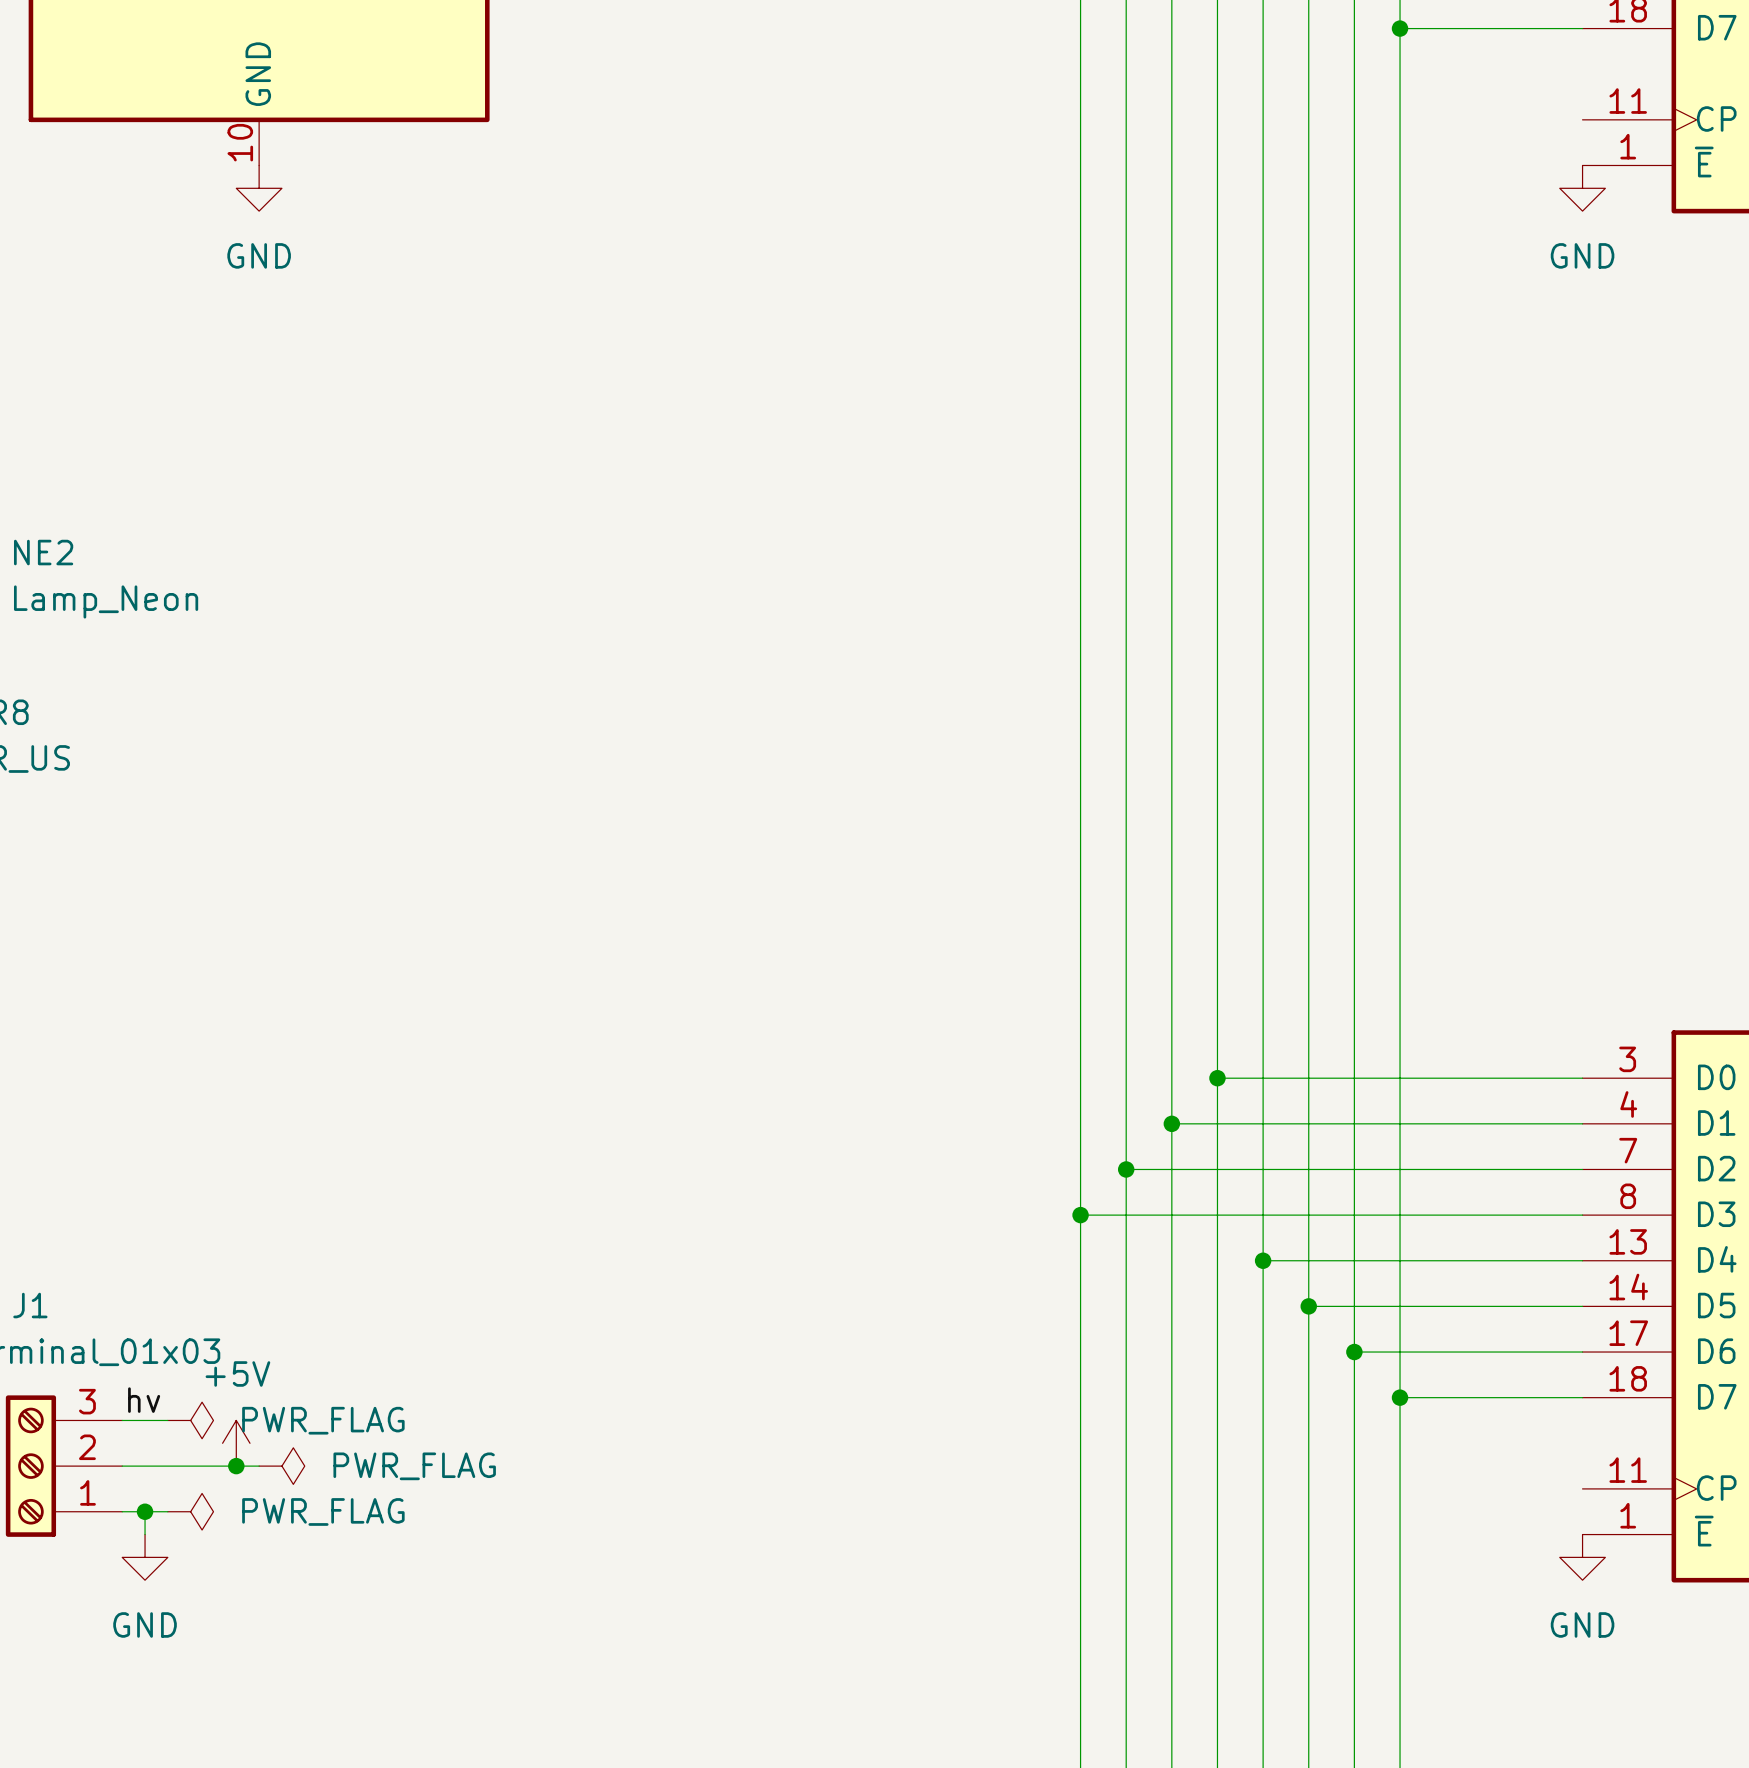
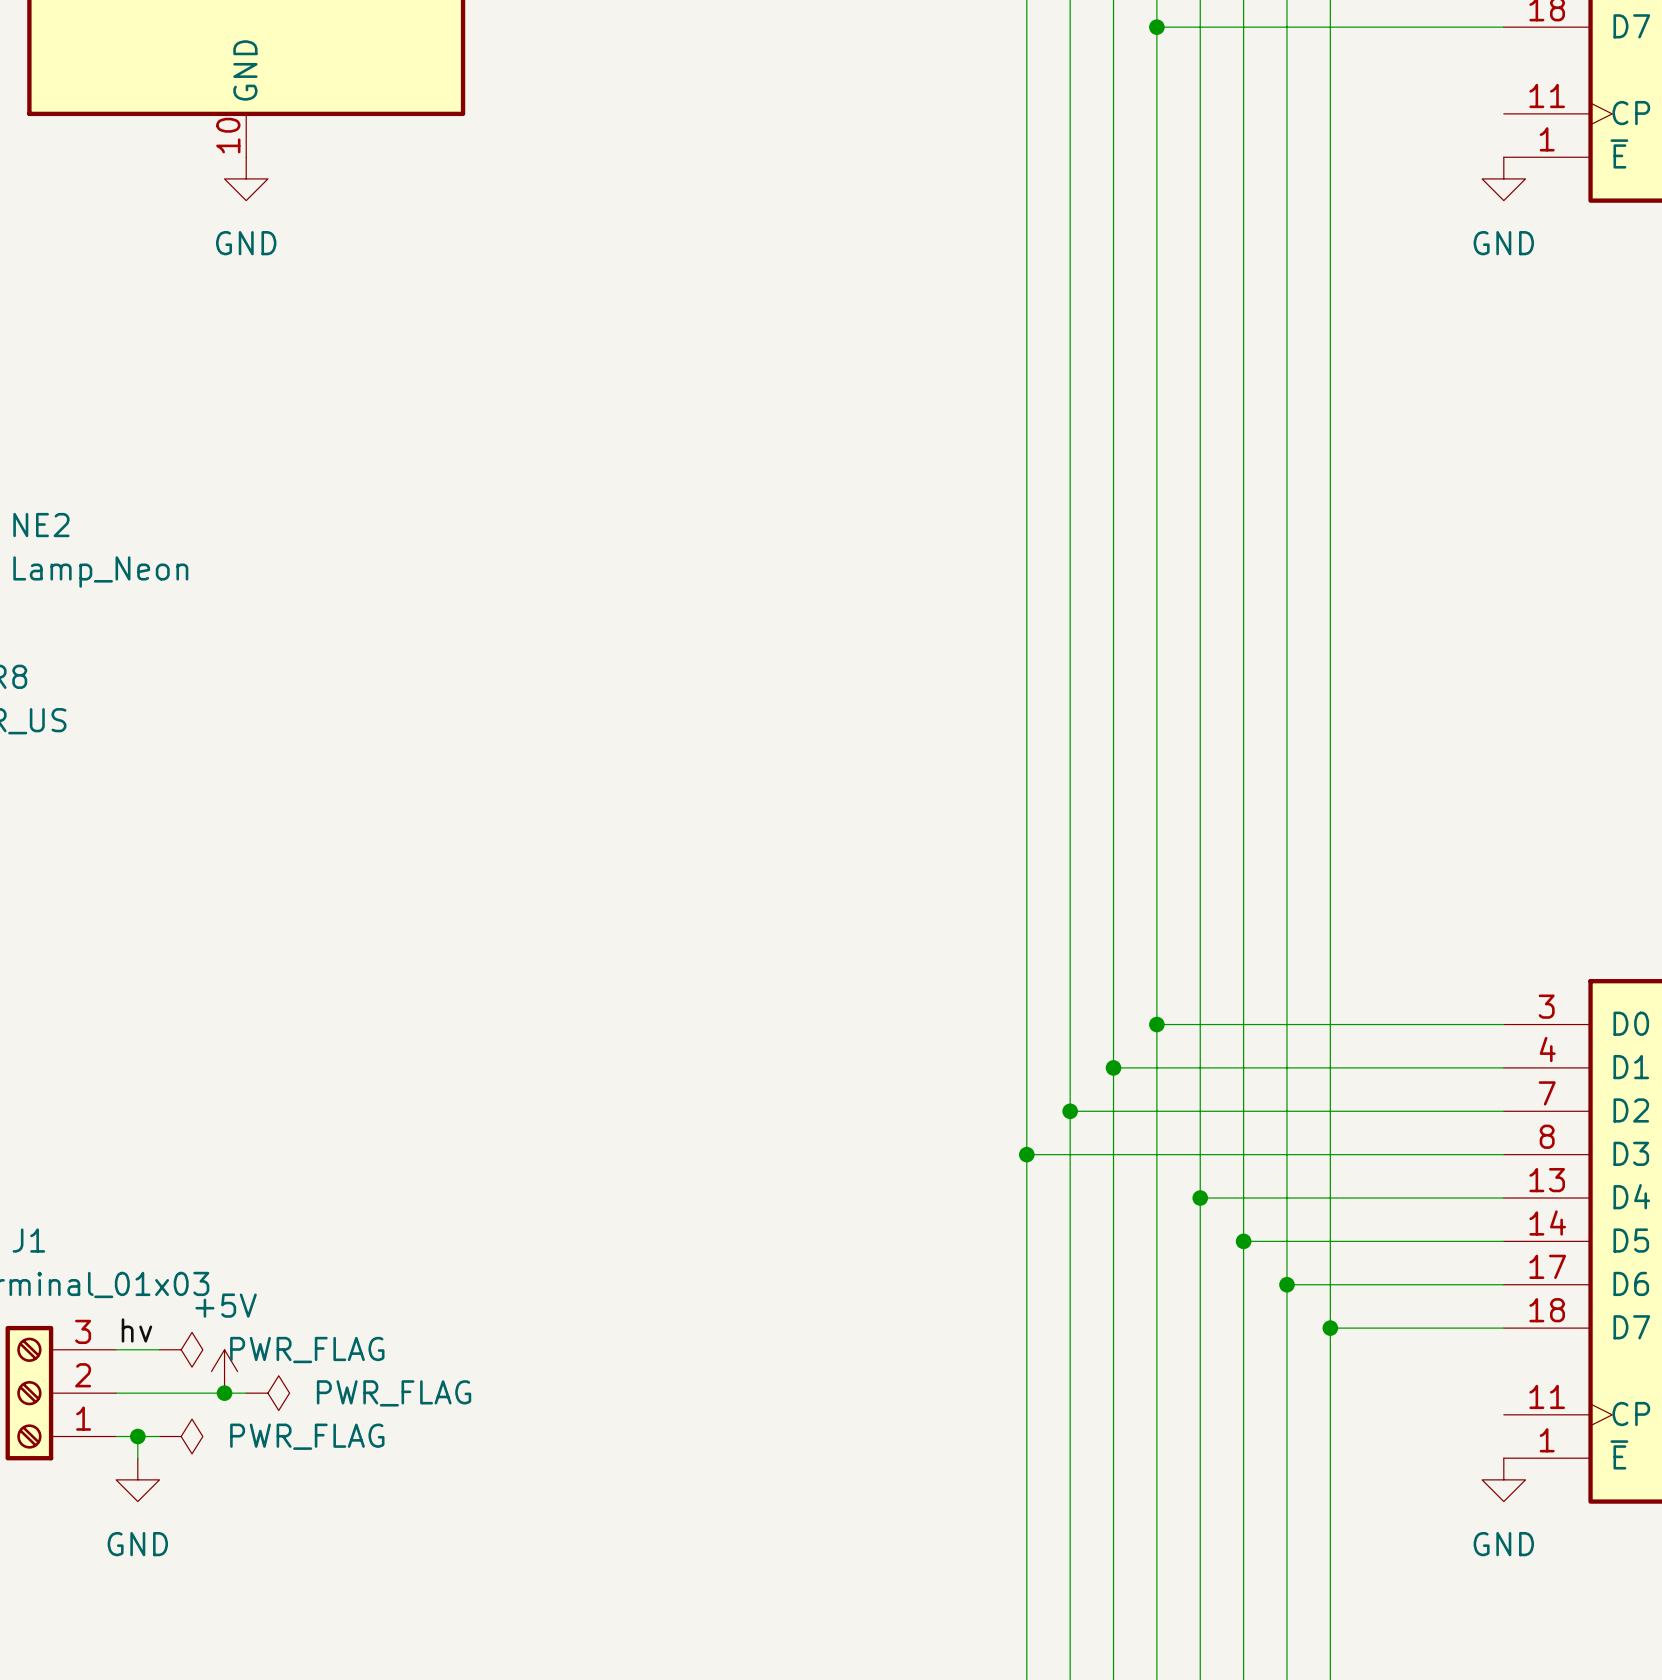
wire: none -> (1156, 27) (1330, 27)
junction: none -> (1156, 27)
junction: (1400, 28) -> none

